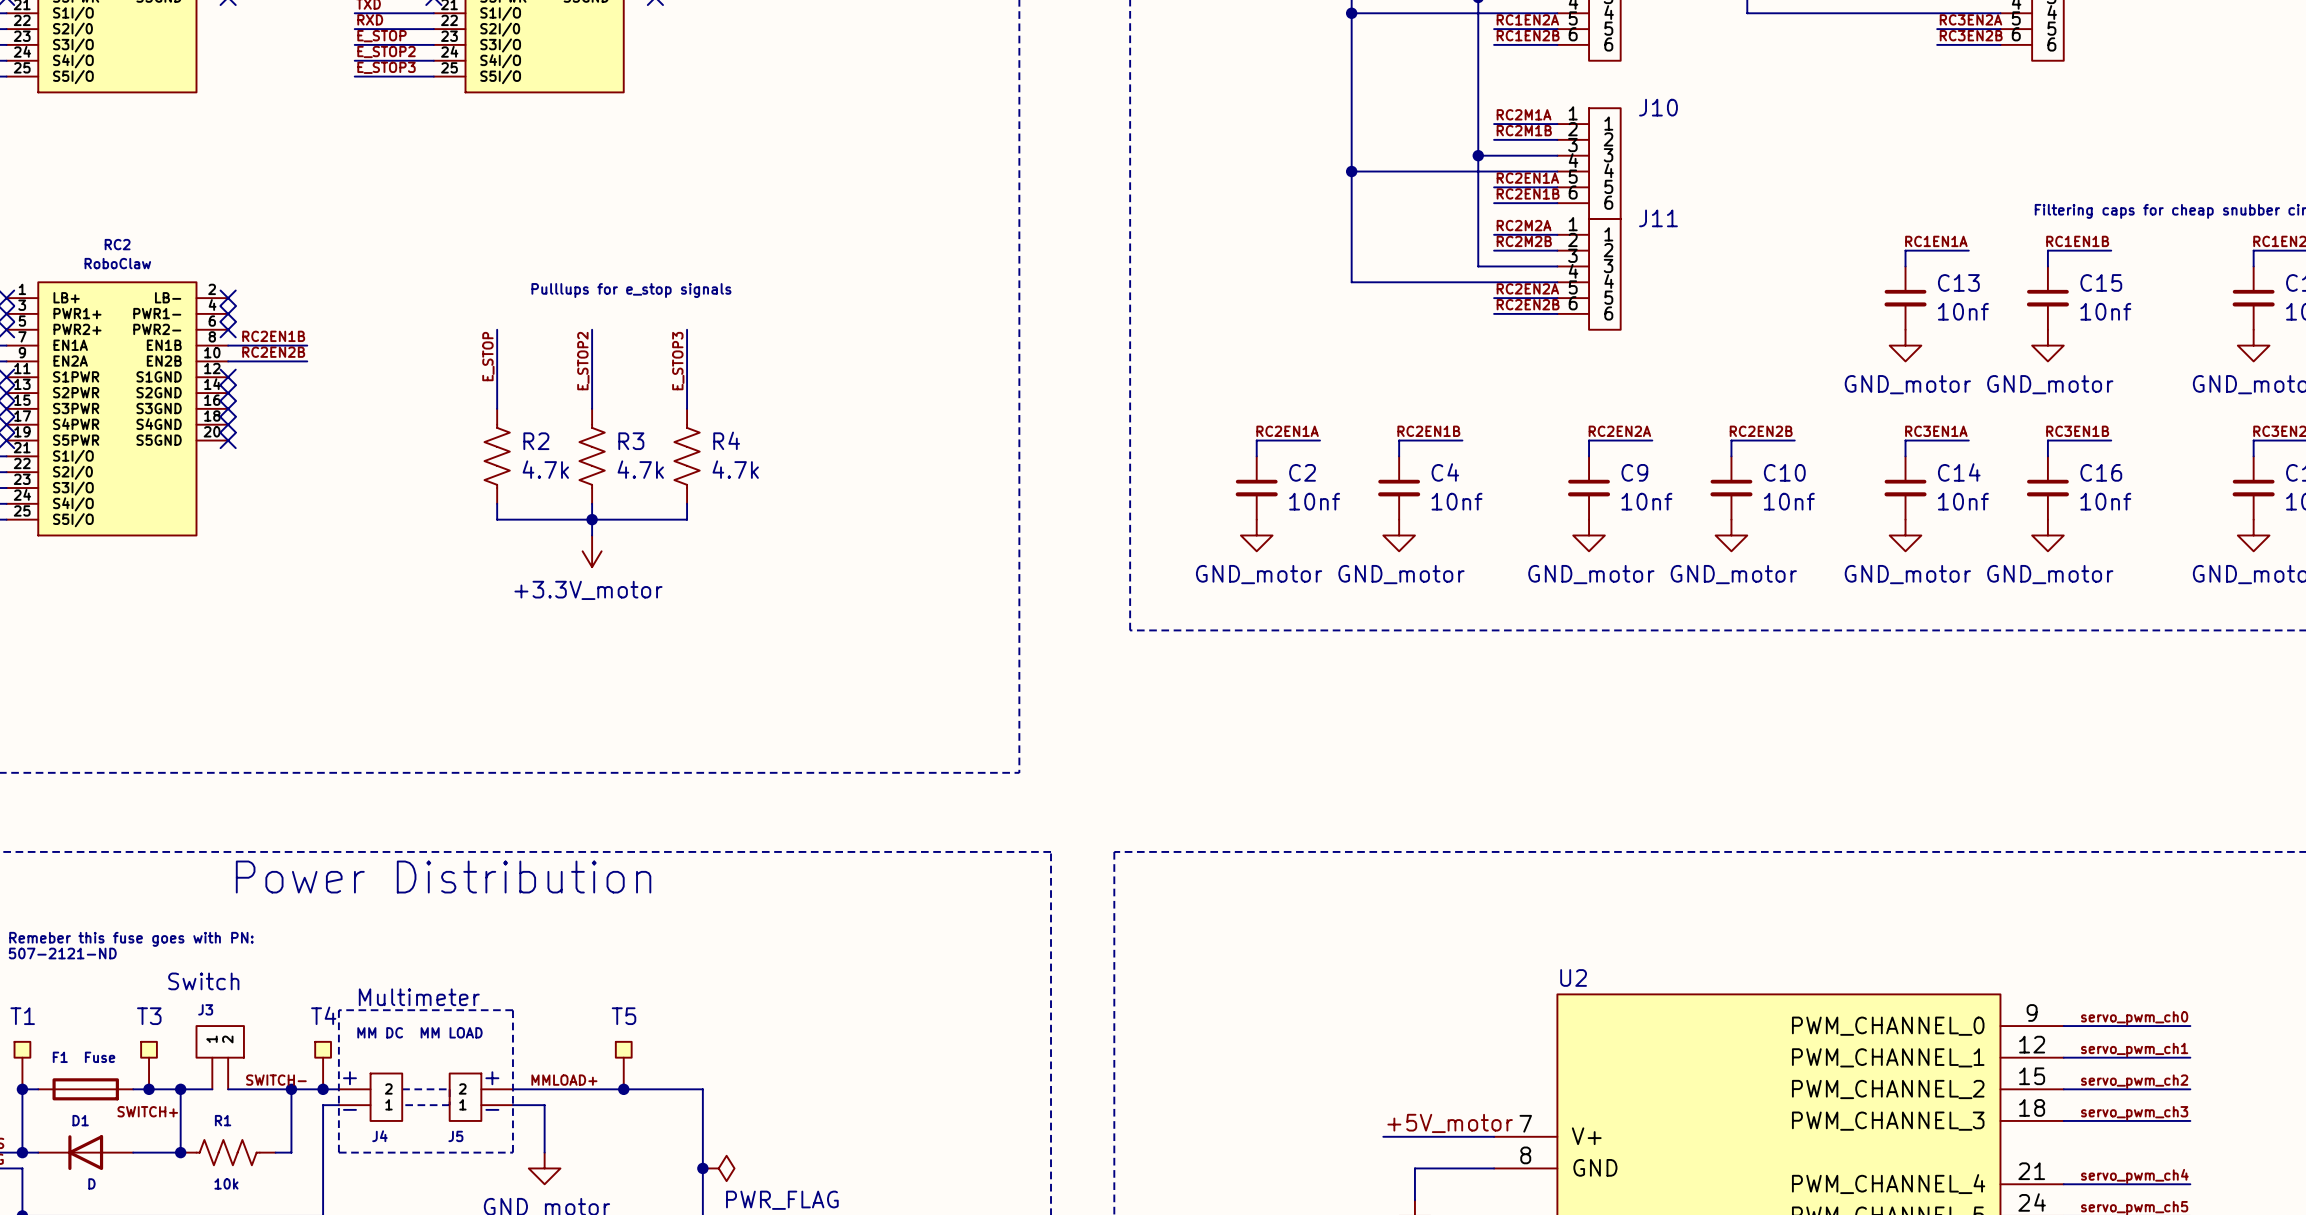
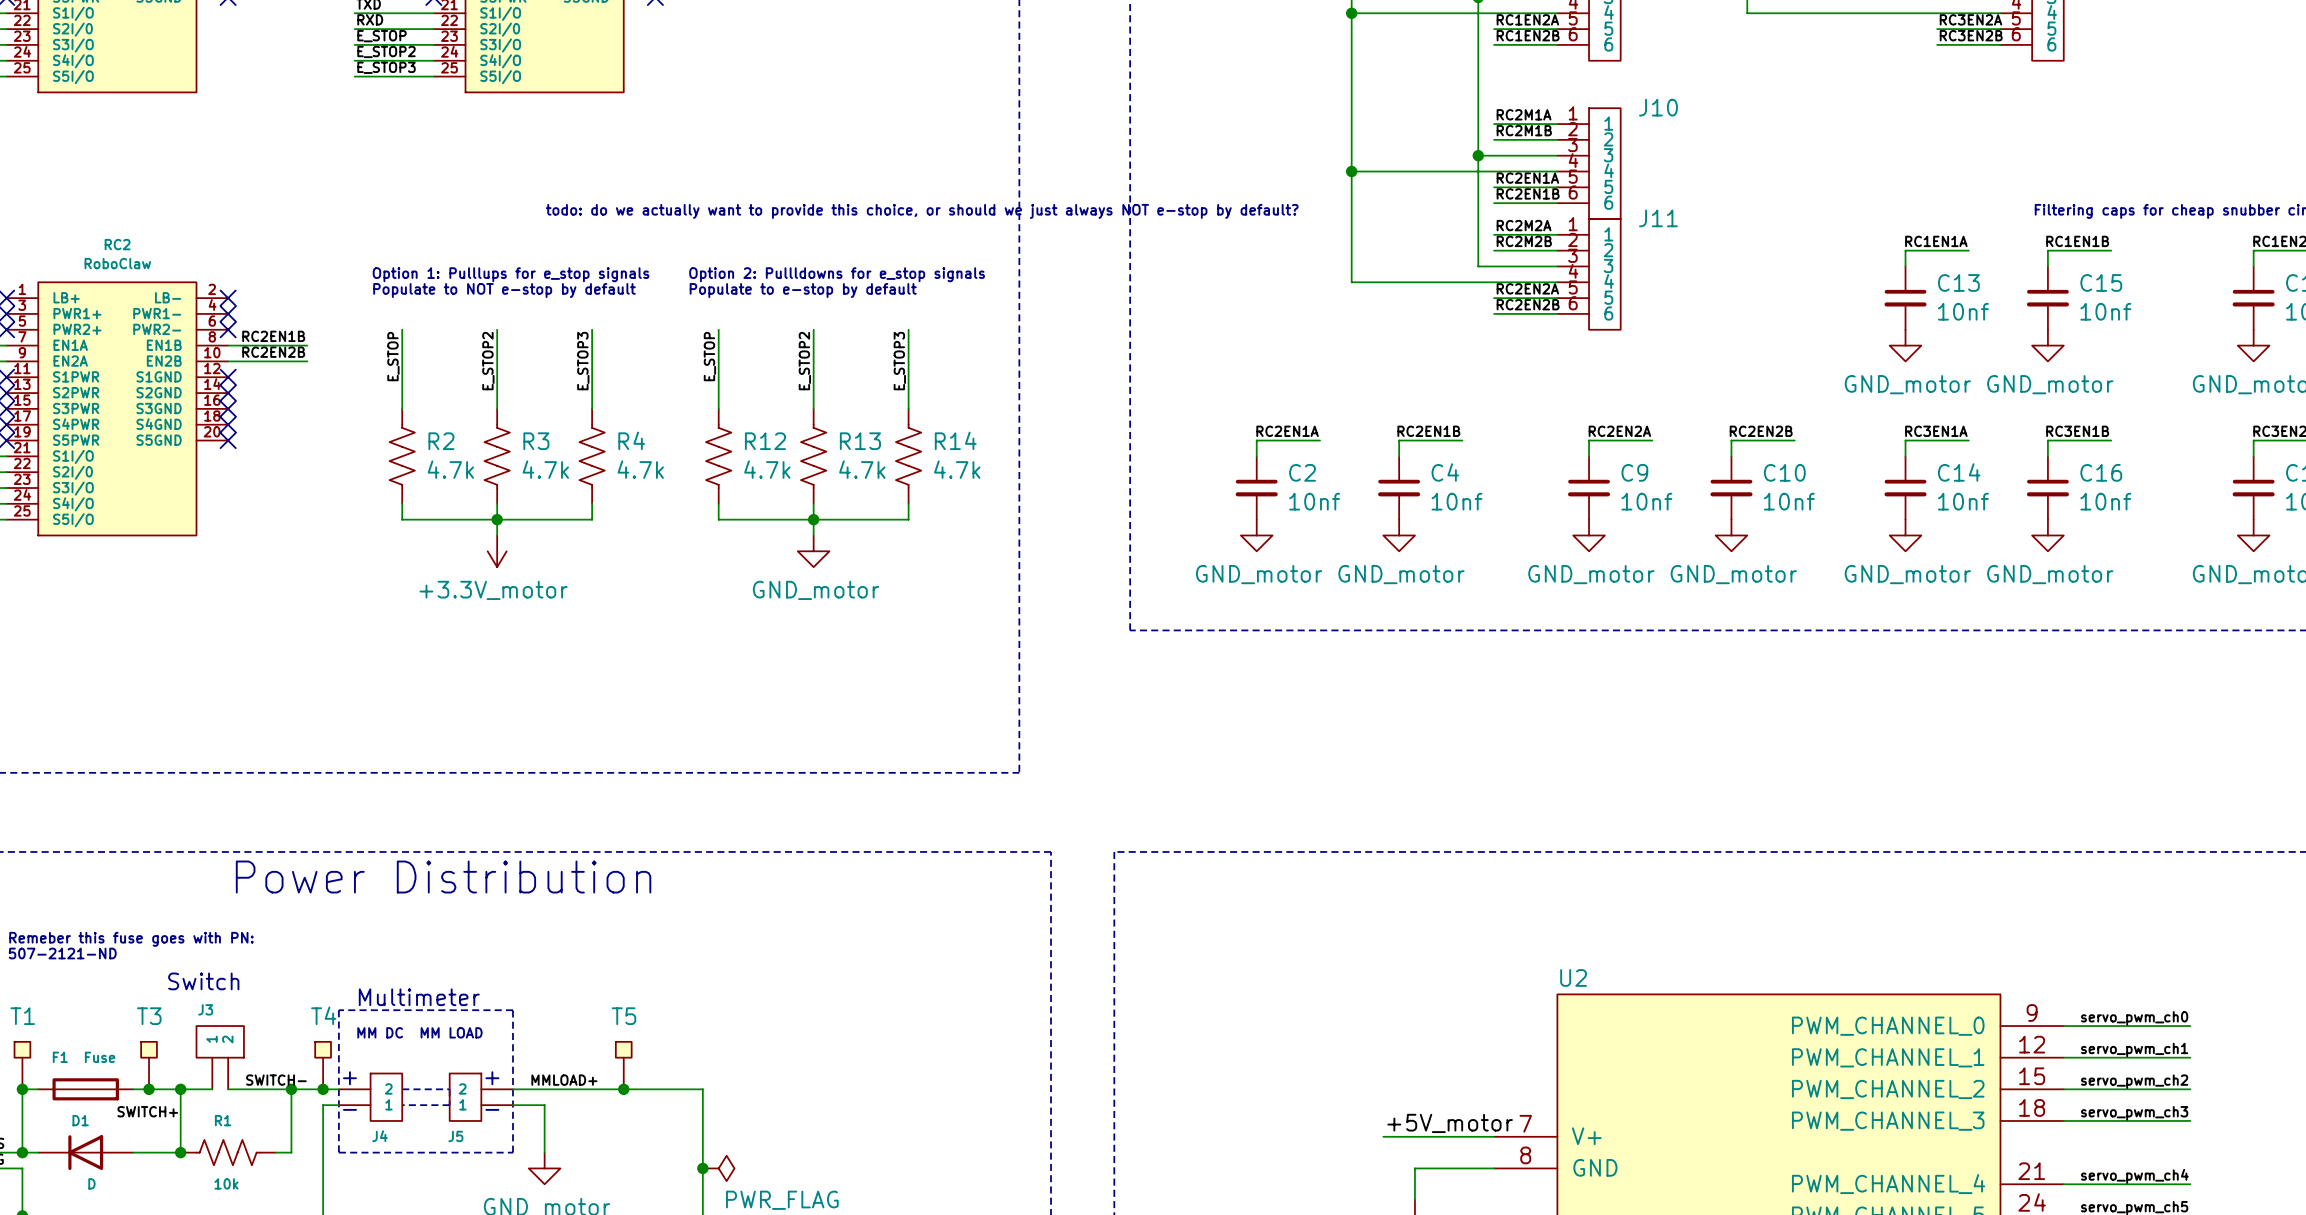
text: none -> todo: do we actually want to provide this choice, or should we just always NOT e-stop by default? (922, 211)
text: none -> Option 1: Pulllups for e_stop signals (511, 274)
text: none -> Option 2: Pullldowns for e_stop signals (837, 274)
text: none -> Populate to NOT e-stop by default (504, 290)
text: Pulllups for e_stop signals (631, 290) -> none
text: none -> Populate to e-stop by default (803, 290)
wire: none -> (402, 329) (402, 408)
wire: (687, 329) (687, 408) -> (718, 329) (718, 408)
wire: none -> (813, 329) (813, 408)
wire: none -> (908, 329) (908, 408)
label: none -> E_STOP (393, 356)
label: E_STOP (488, 356) -> E_STOP2 (488, 361)
label: none -> E_STOP (709, 356)
label: E_STOP2 (583, 361) -> E_STOP3 (583, 361)
label position: E_STOP3 (678, 361) -> E_STOP3 (899, 361)
label: none -> E_STOP2 (804, 361)
R2 name: R2 (536, 441) -> R3 (536, 441)
R3 name: R3 (631, 441) -> R4 (631, 440)
R2: none -> 4.7k (402, 456)
R4: 4.7k (687, 456) -> none
R12: none -> 4.7k (718, 456)
R13: none -> 4.7k (813, 456)
R14: none -> 4.7k (908, 456)
wire: none -> (402, 503) (402, 519) (497, 519) (497, 535)
wire: (687, 503) (687, 519) (592, 519) (592, 535) -> none
wire: none -> (718, 503) (718, 519) (908, 519) (908, 503)
wire: none -> (813, 503) (813, 535)
junction: none -> (497, 519)
junction: (592, 519) -> none
junction: none -> (813, 519)
power symbol position: +3.3V_motor (592, 551) -> +3.3V_motor (497, 551)
power symbol: none -> GND_motor (813, 551)

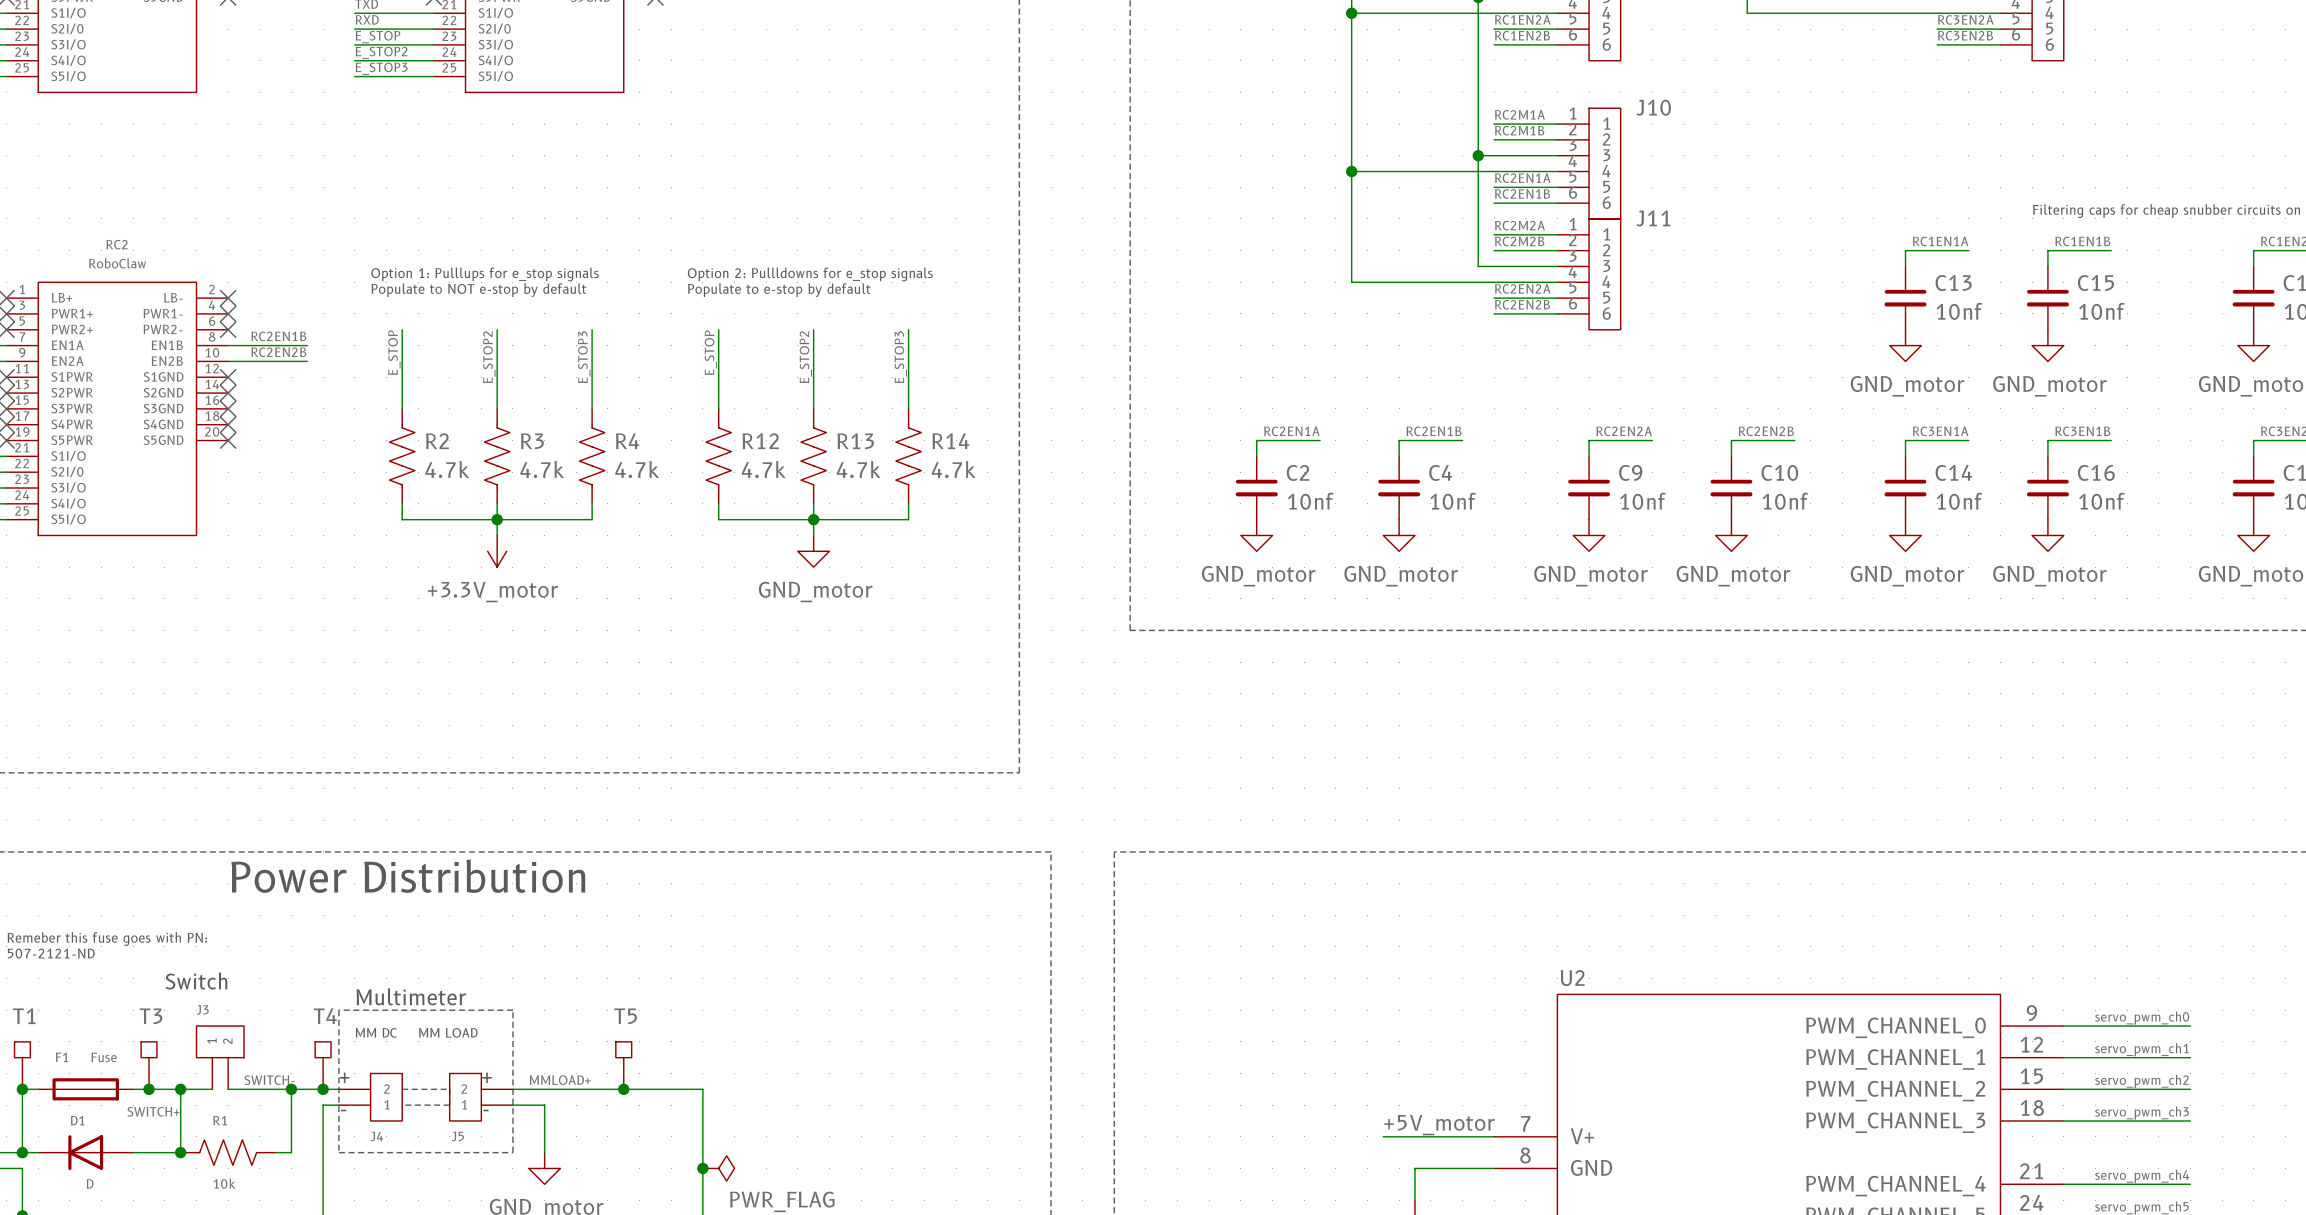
text: todo: do we actually want to provide this choice, or should we just always NOT e-stop by default? (922, 211) -> none

